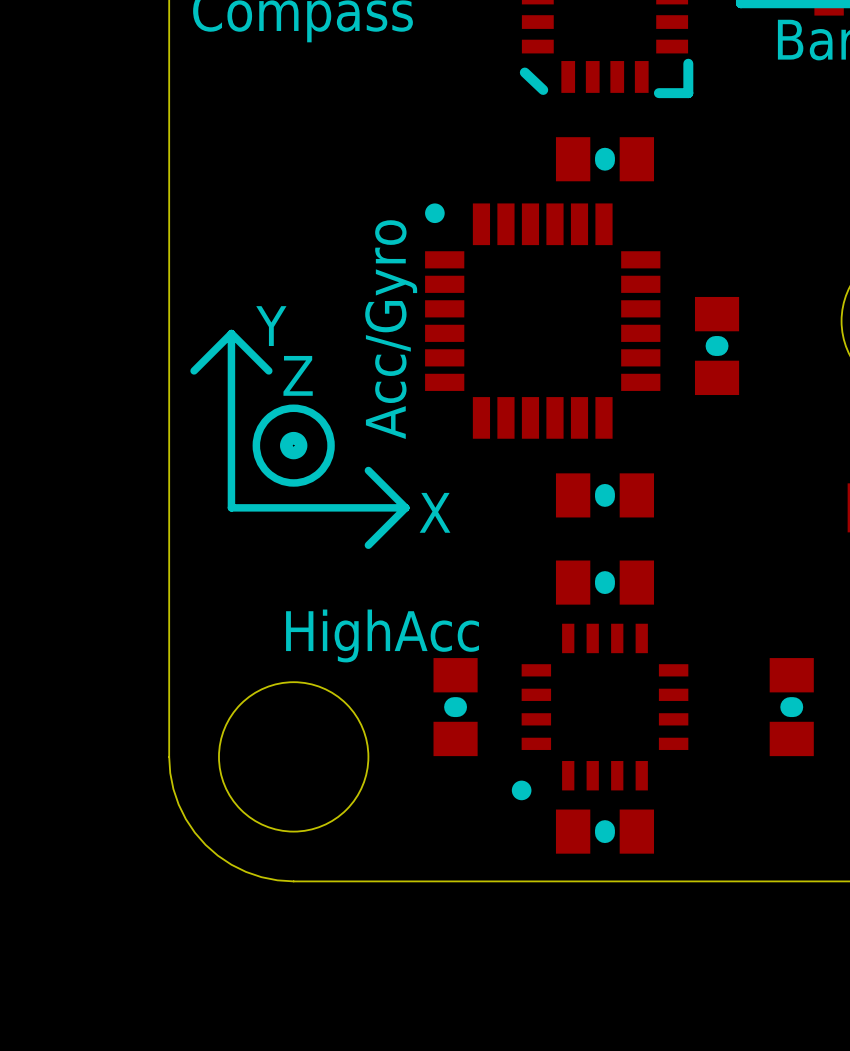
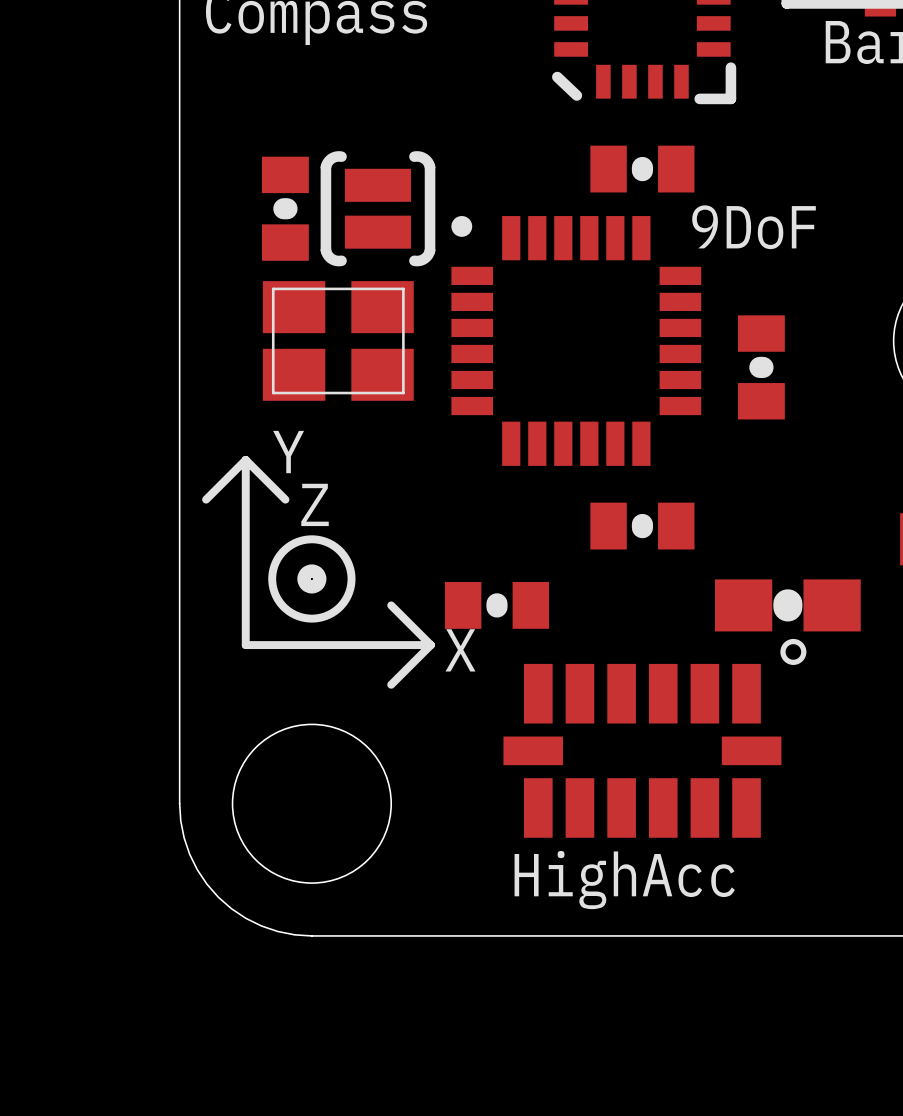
part: none -> (285, 208)
part: none -> (377, 208)
text: none -> 9DoF (754, 227)
part: none -> (338, 340)
text: Acc/Gyro (391, 329) -> none
drawing position: (299, 439) -> (318, 572)
part: none -> (496, 605)
part: none -> (787, 605)
part: (604, 582) -> none
part footprint: [511, 623, 689, 801] -> [503, 638, 807, 838]
text position: HighAcc (382, 635) -> HighAcc (624, 880)
part: (455, 707) -> none
part: (791, 707) -> none
part: (604, 831) -> none

